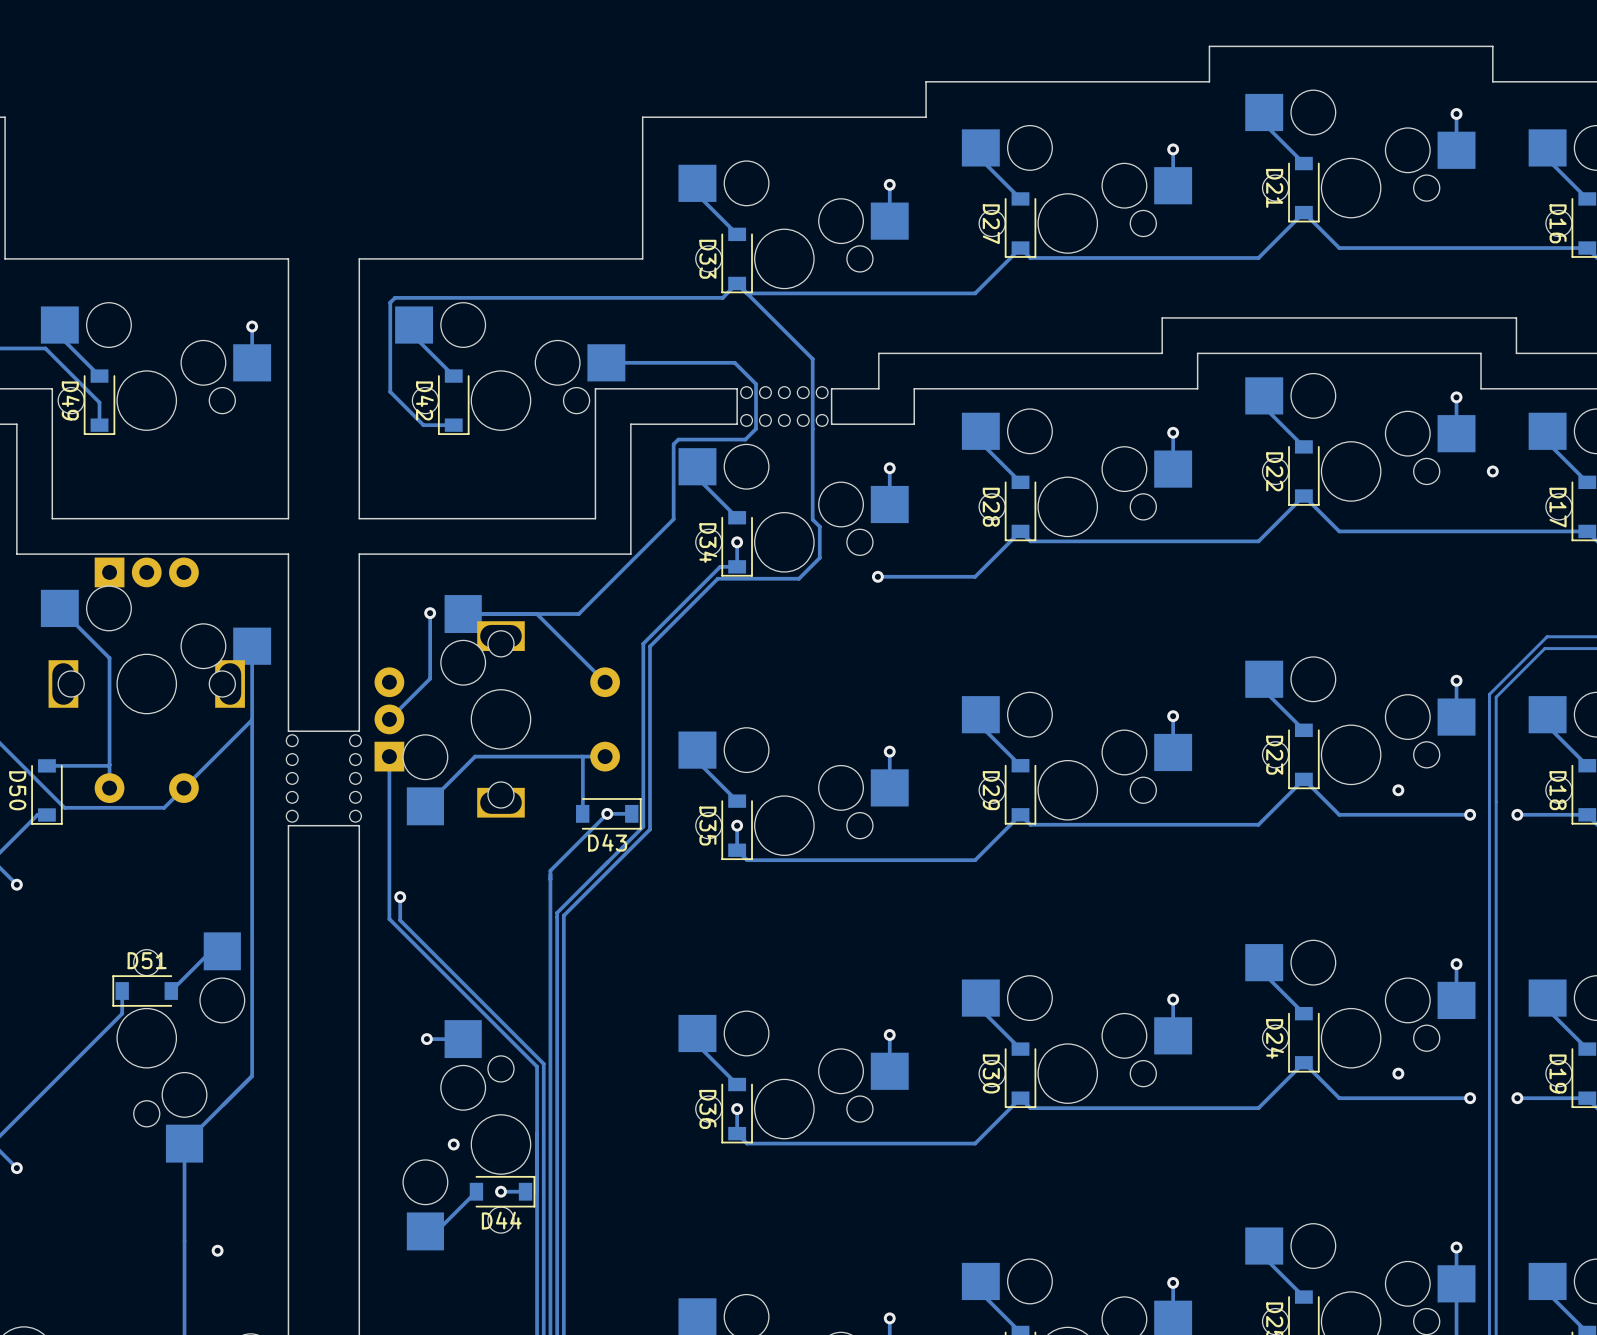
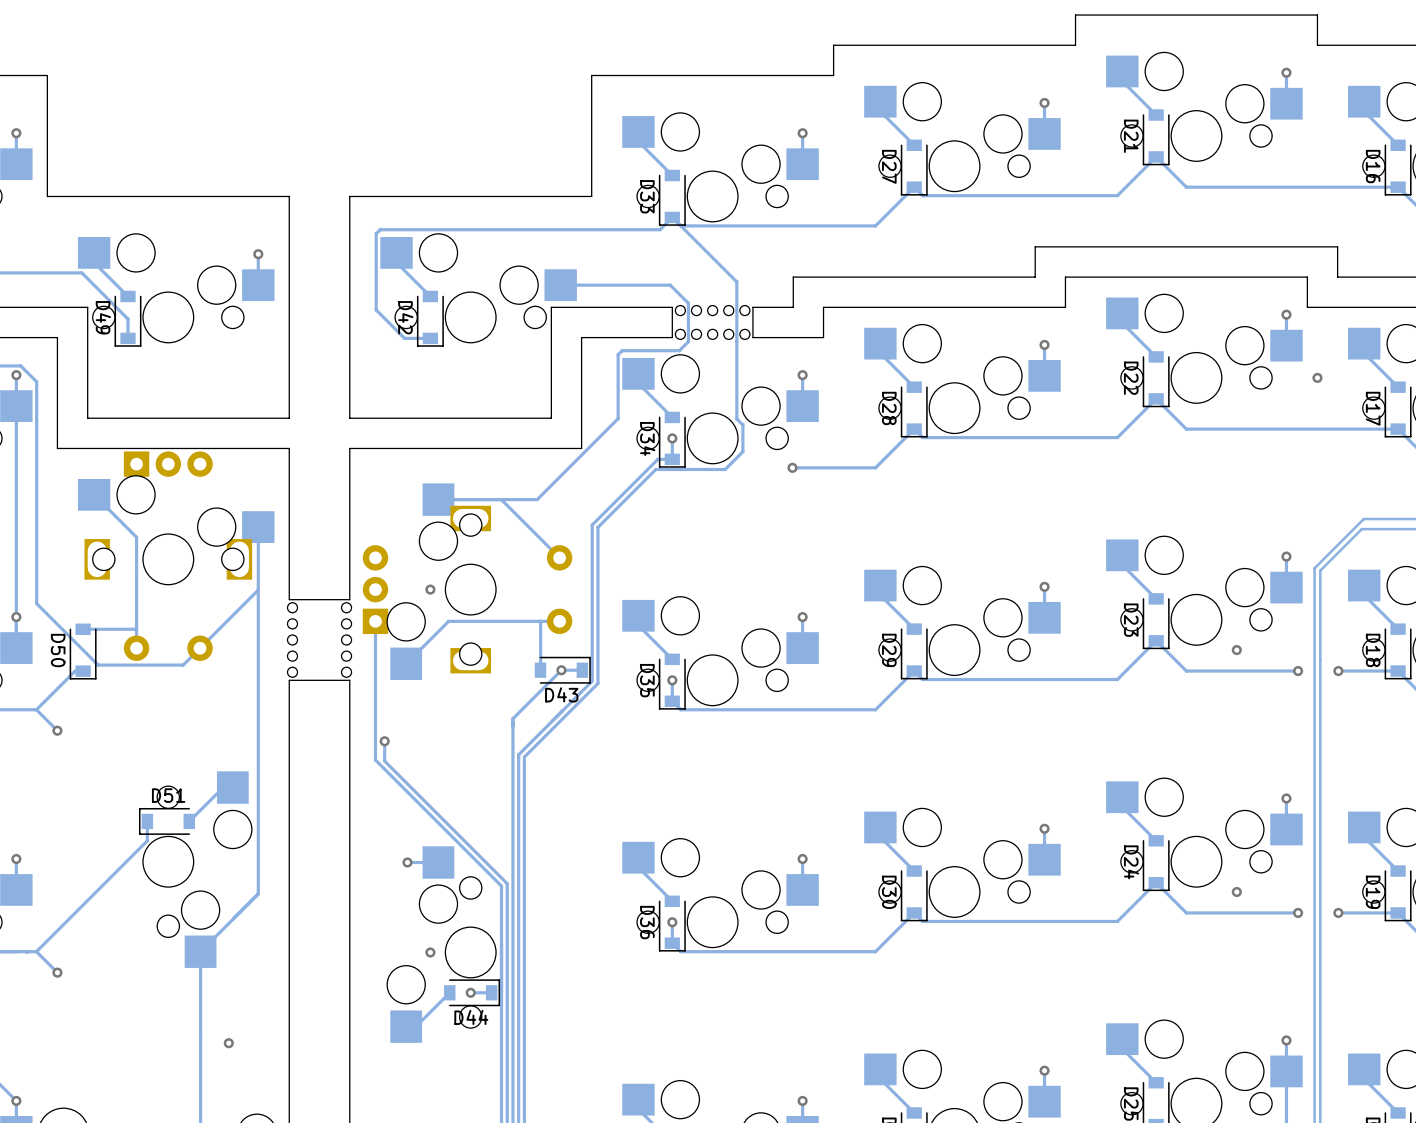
track: (430, 613) (430, 678) (389, 719) -> none
via: (430, 613) -> none
via: none -> (430, 589)

